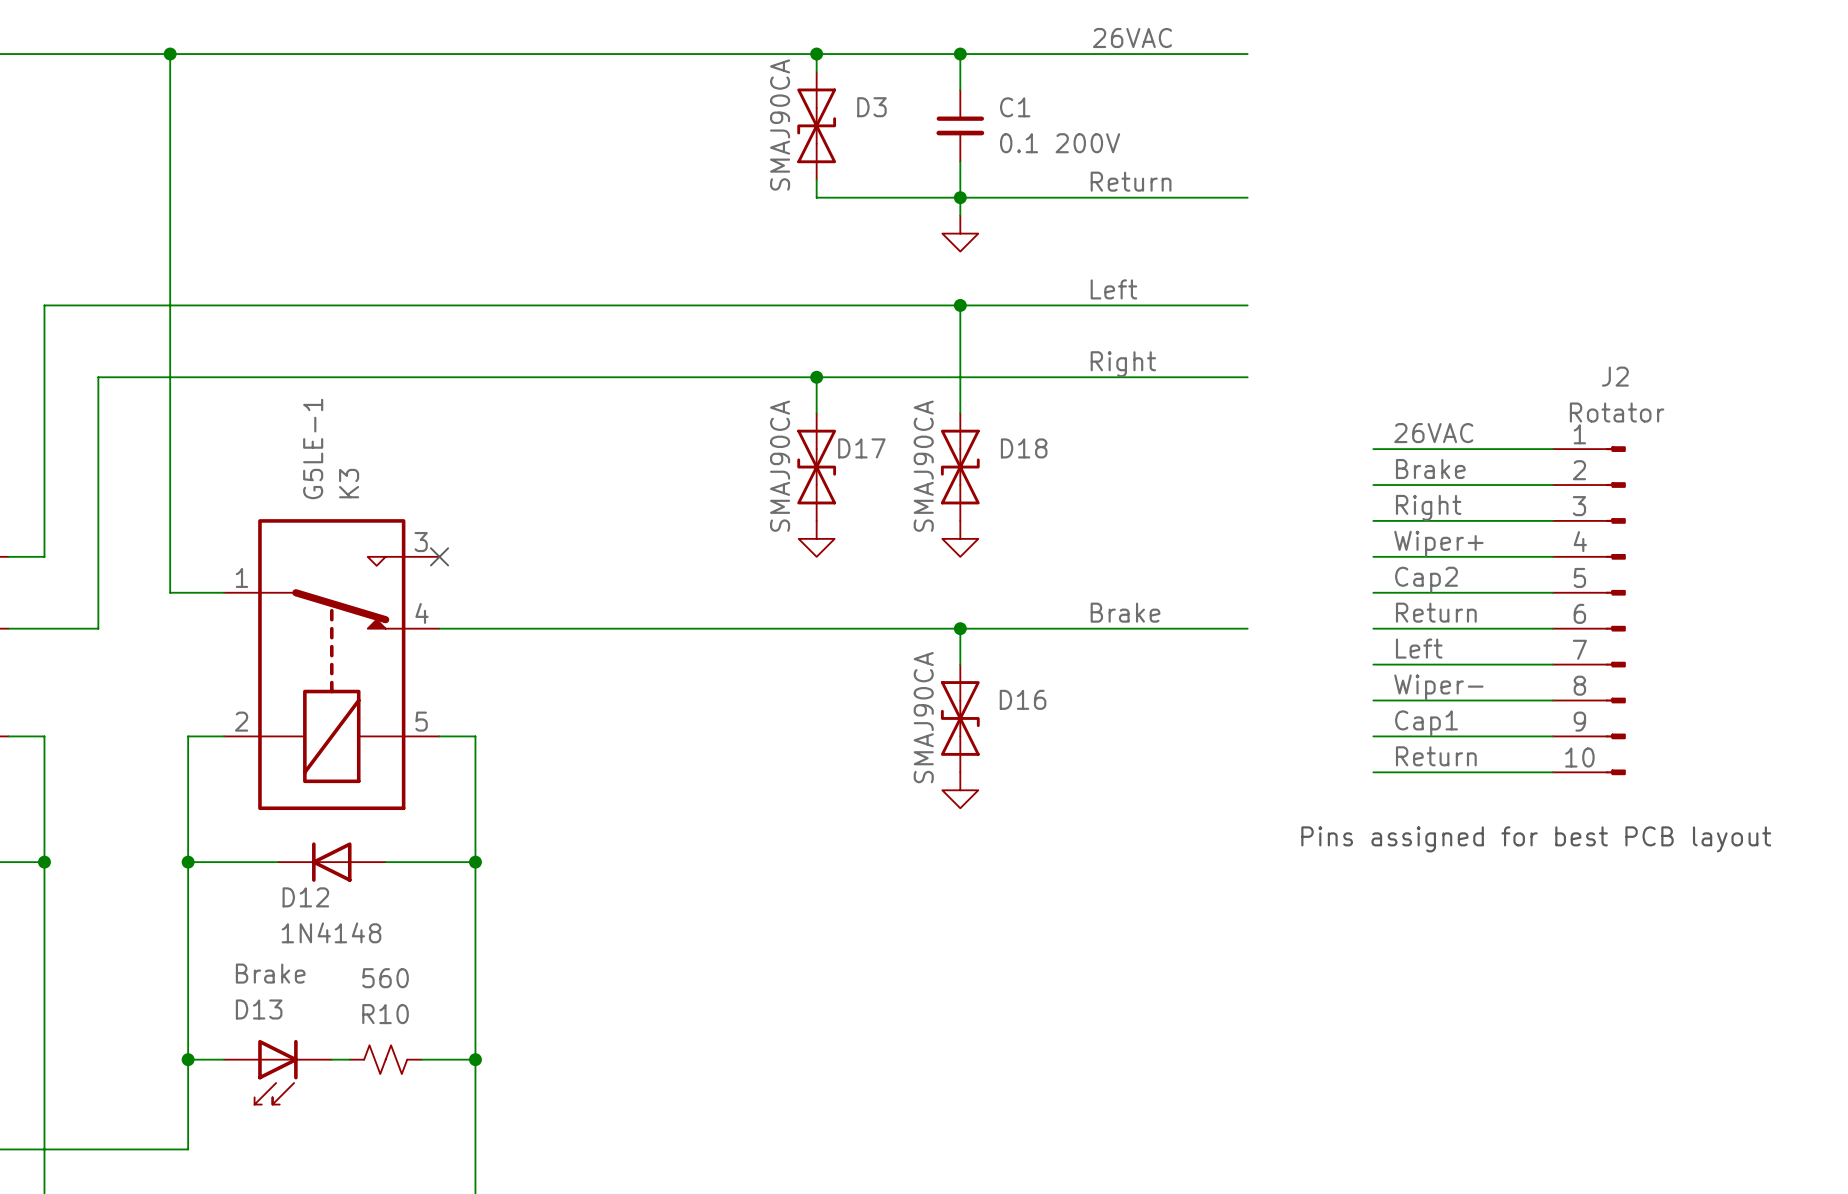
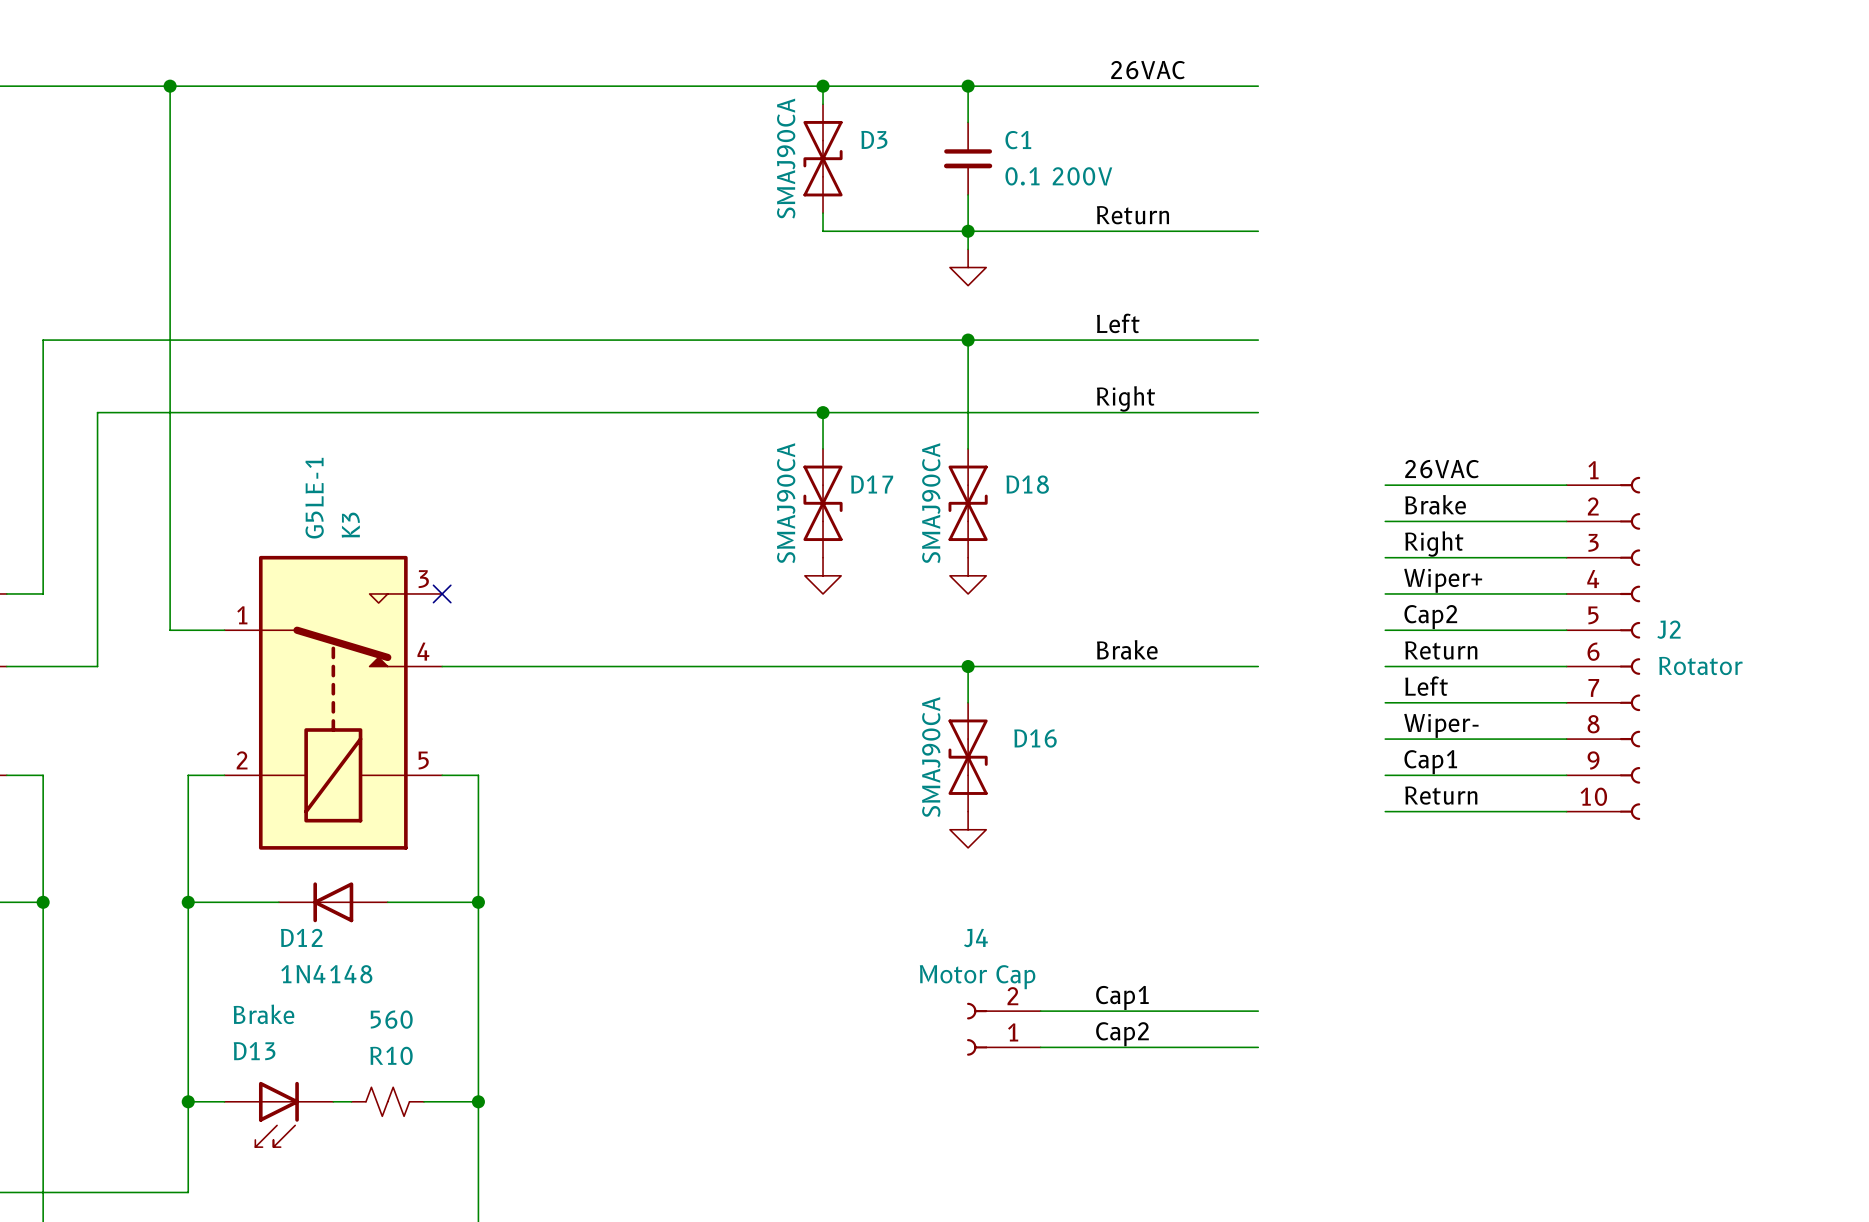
J2 name position: J2 (1615, 376) -> J2 (1668, 629)
J2 value position: Rotator (1617, 412) -> Rotator (1700, 665)
J2 symbol: [1552, 446, 1626, 776] -> [1566, 476, 1641, 820]
text: Pins assigned for best PCB layout (1536, 839) -> none
label: none -> Cap1 (1122, 997)
wire: none -> (1040, 1011) (1258, 1011)
J4: none -> Motor Cap (1003, 1029)
label: none -> Cap2 (1122, 1034)
wire: none -> (1040, 1047) (1258, 1047)

